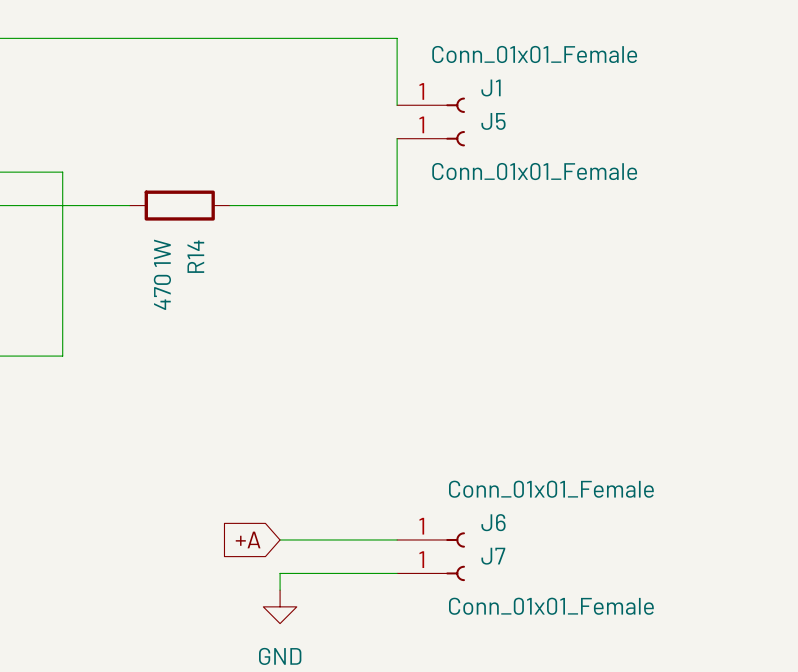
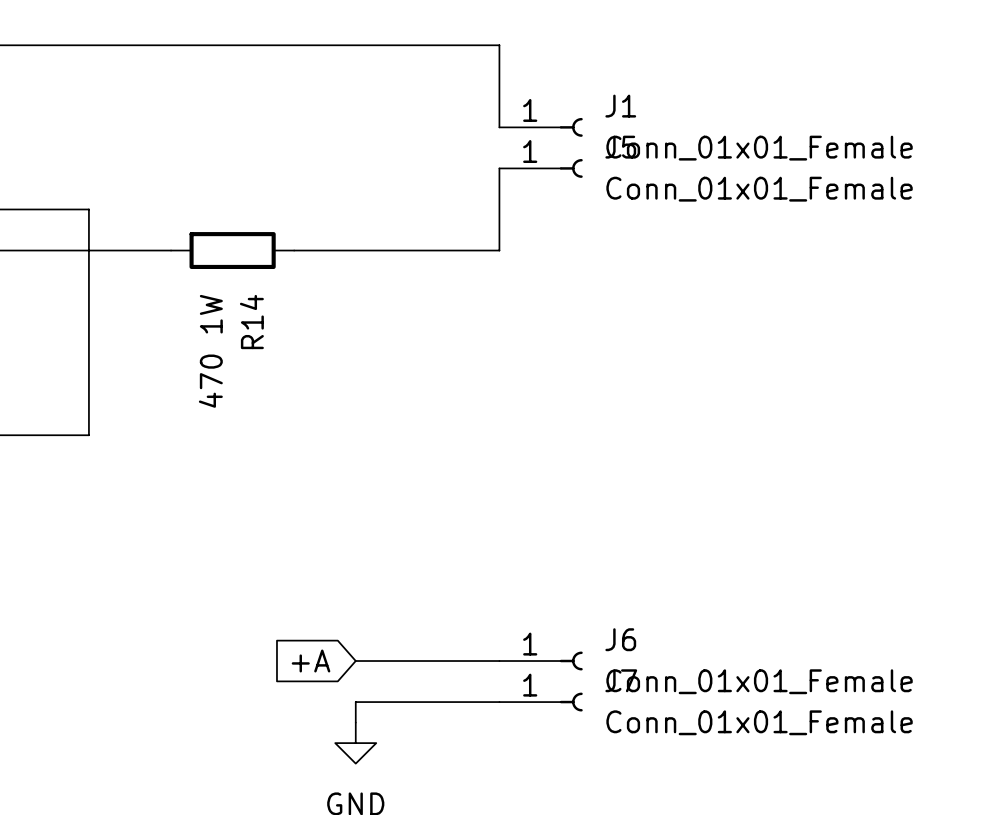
J1 value position: Conn_01x01_Female (534, 54) -> Conn_01x01_Female (759, 148)
J5 value position: Conn_01x01_Female (534, 171) -> Conn_01x01_Female (759, 189)
J6 value position: Conn_01x01_Female (551, 489) -> Conn_01x01_Female (759, 681)
J7 value position: Conn_01x01_Female (551, 606) -> Conn_01x01_Female (759, 722)

